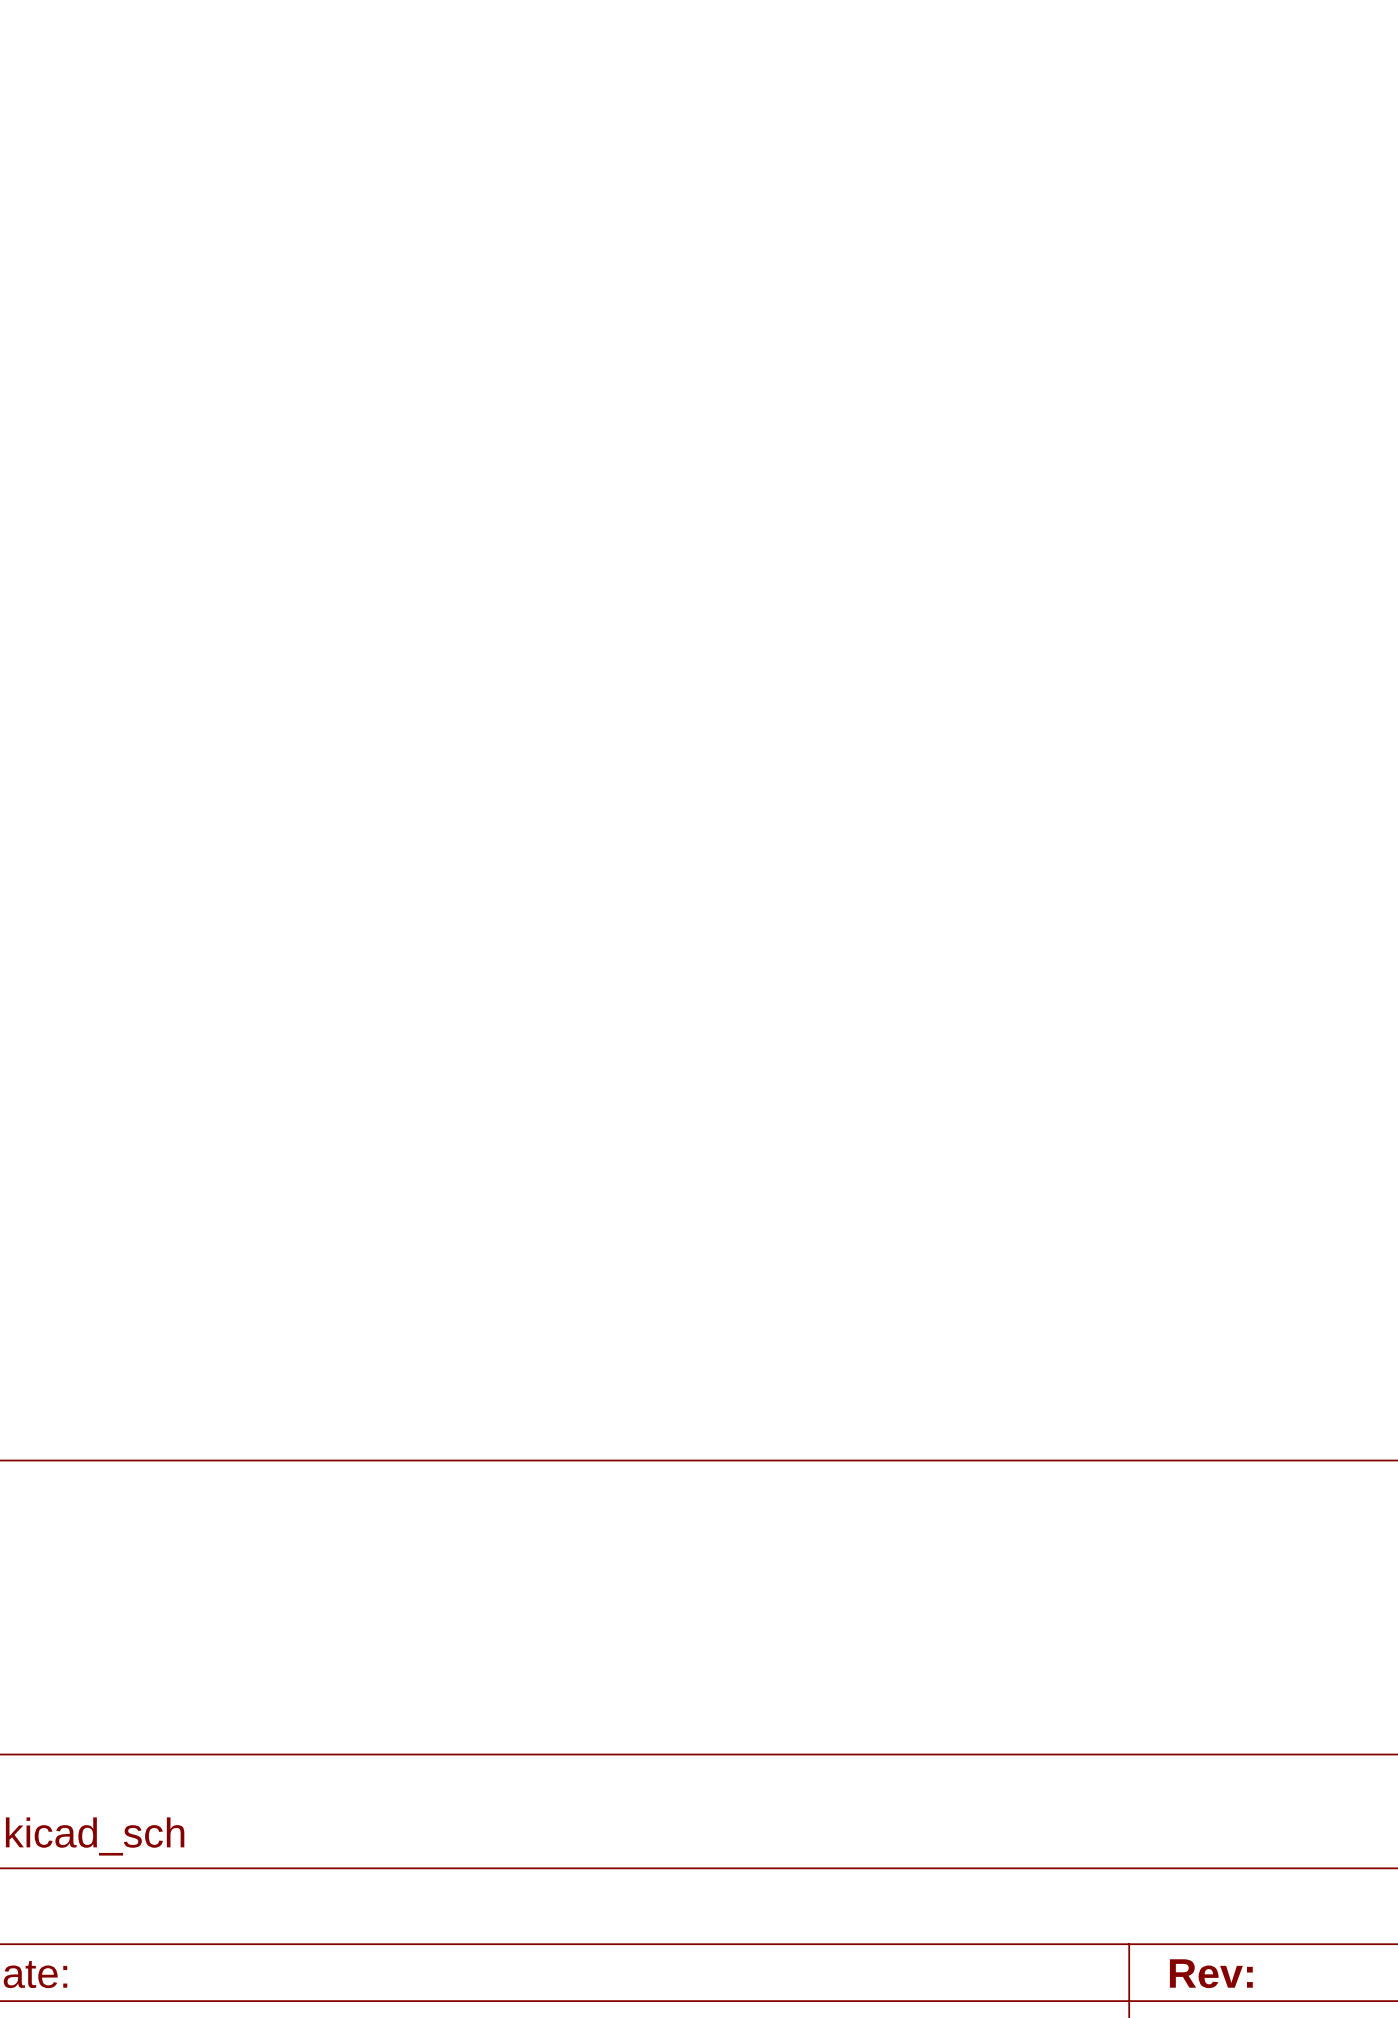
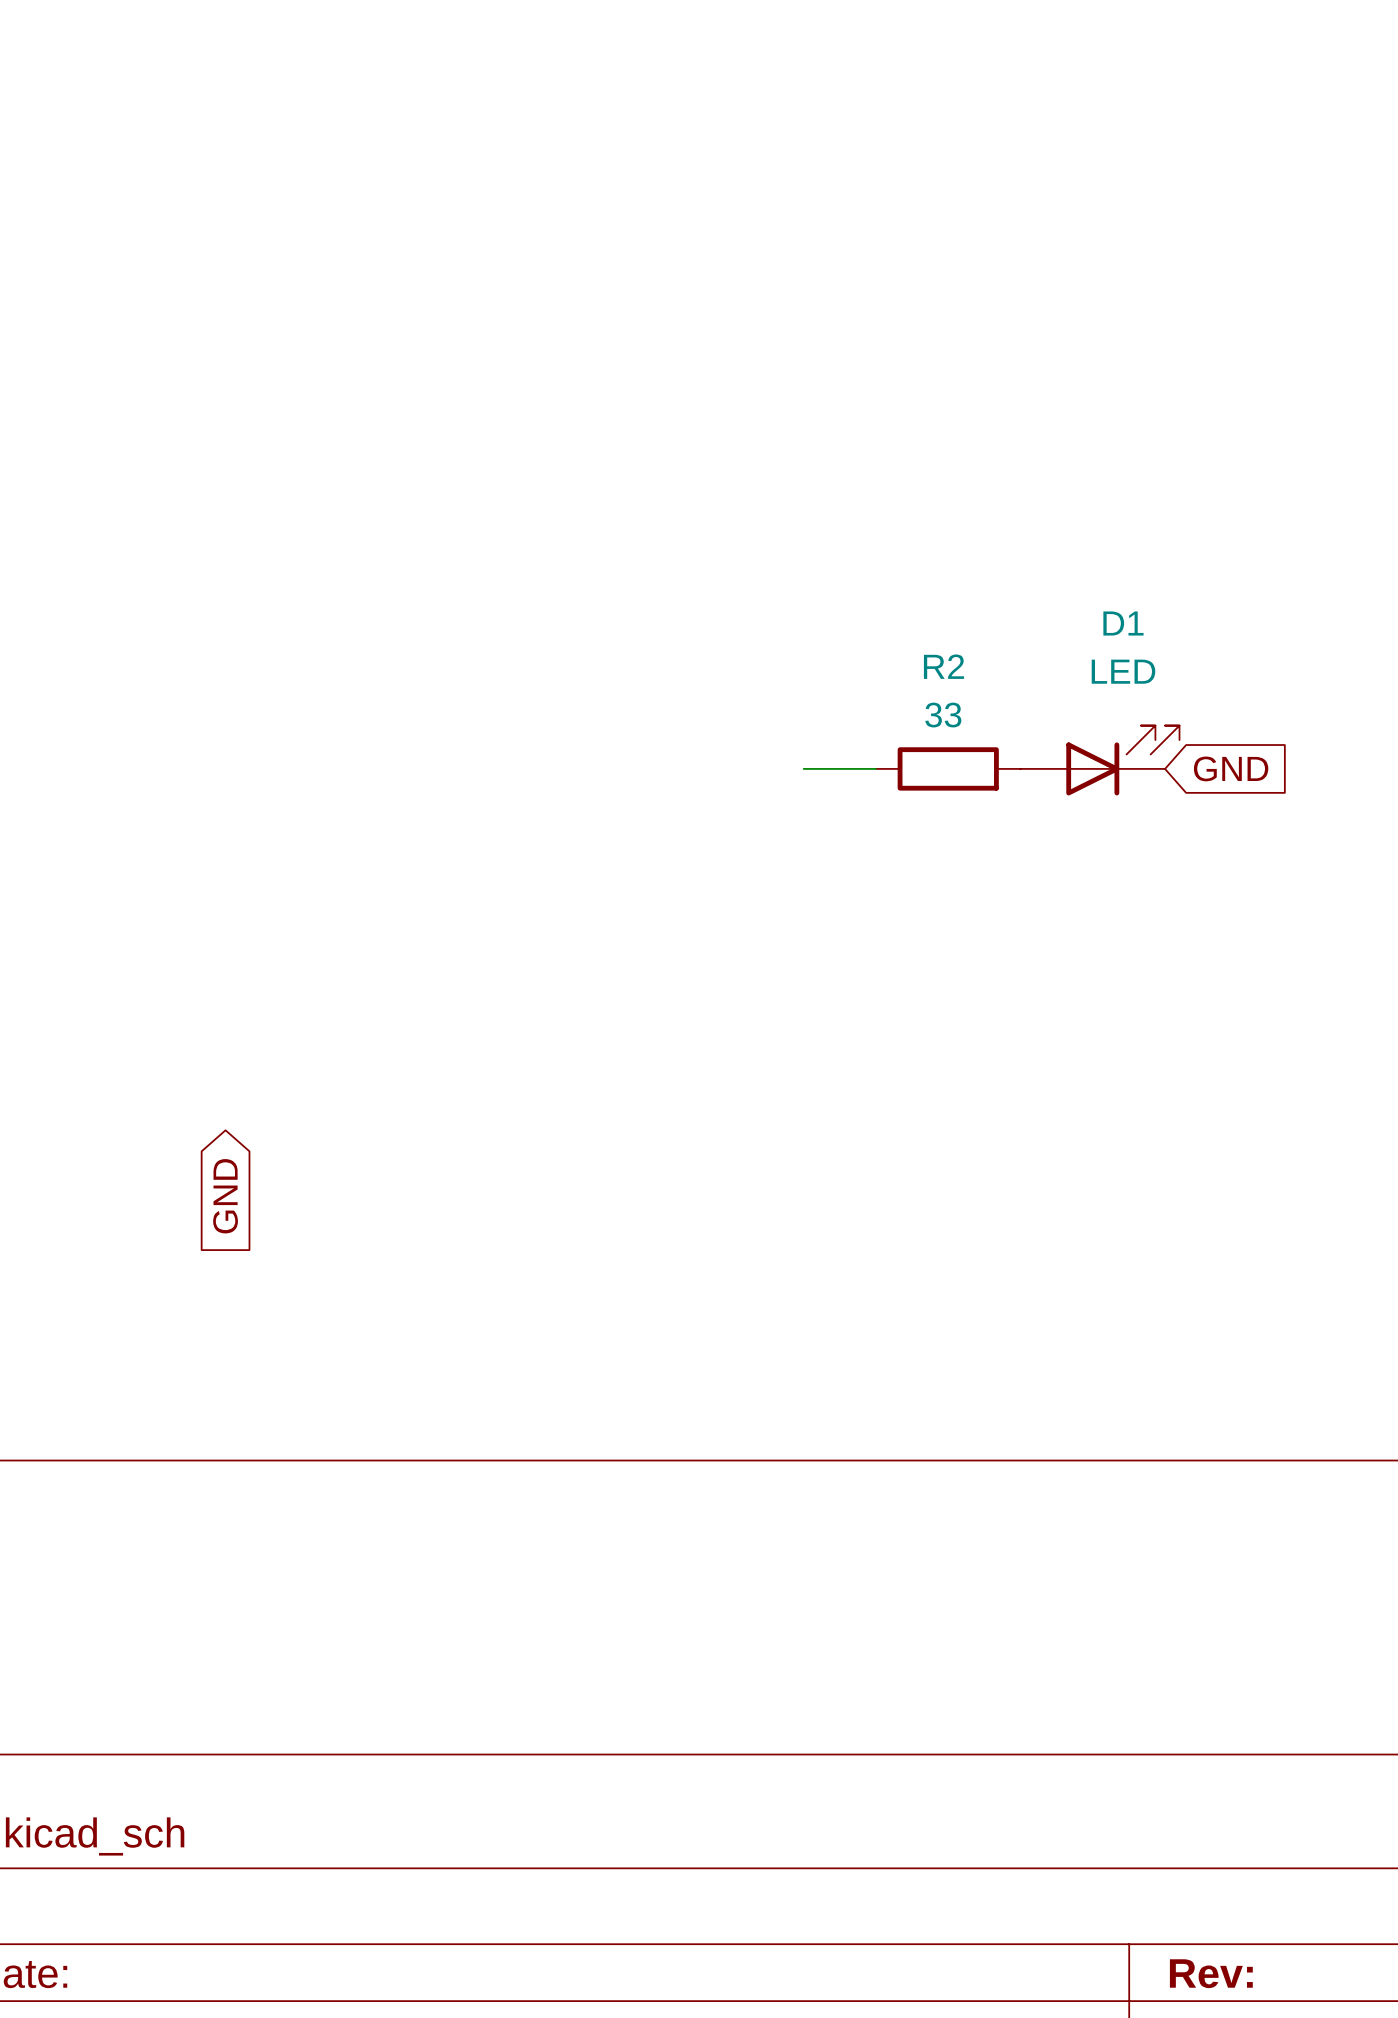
D1: none -> LED (1100, 760)
wire: none -> (803, 768) (875, 768)
R2: none -> 33 (948, 768)
global label: none -> GND (1231, 768)
global label: none -> GND (225, 1196)

